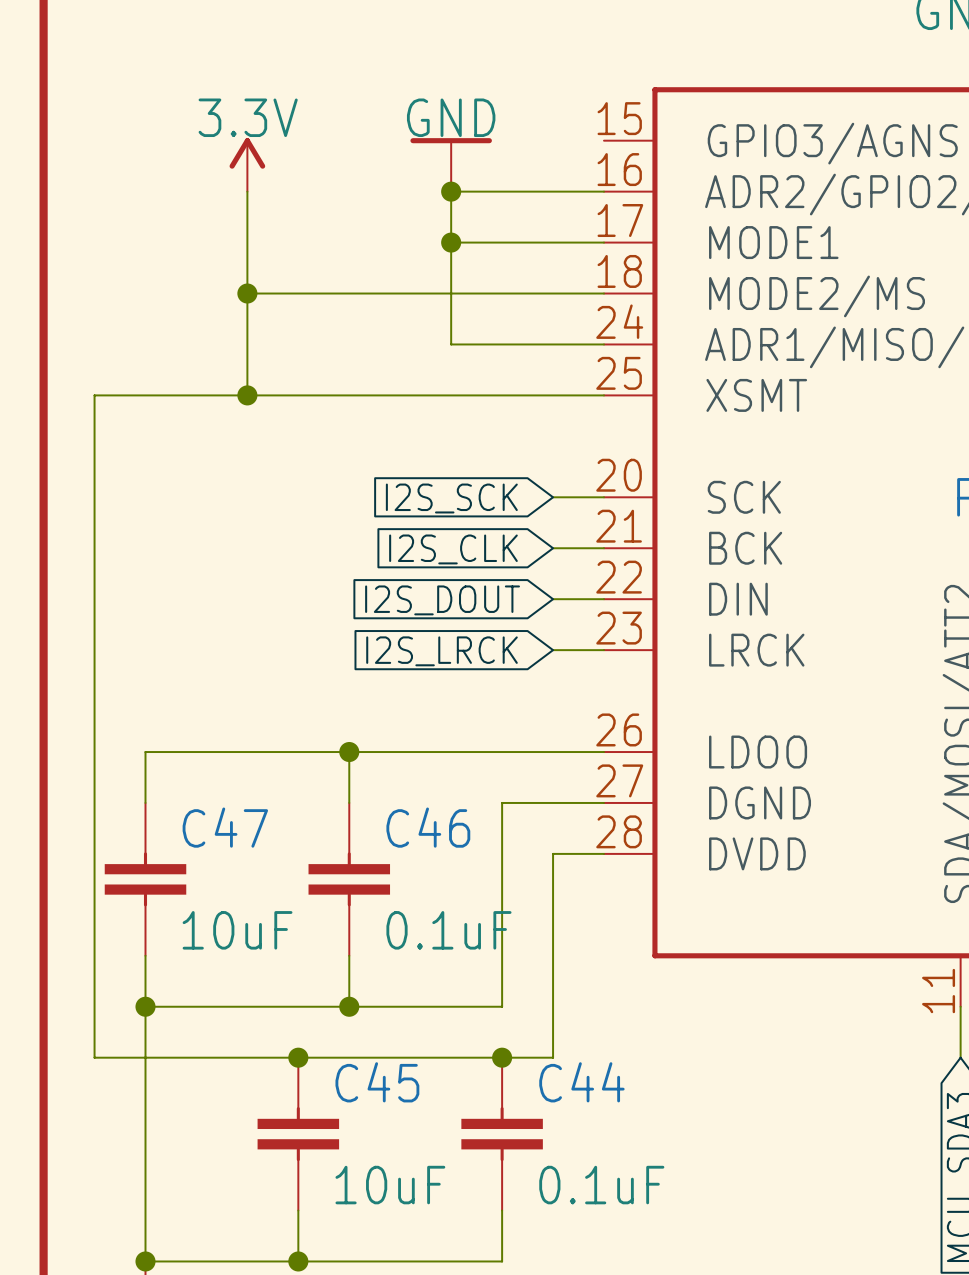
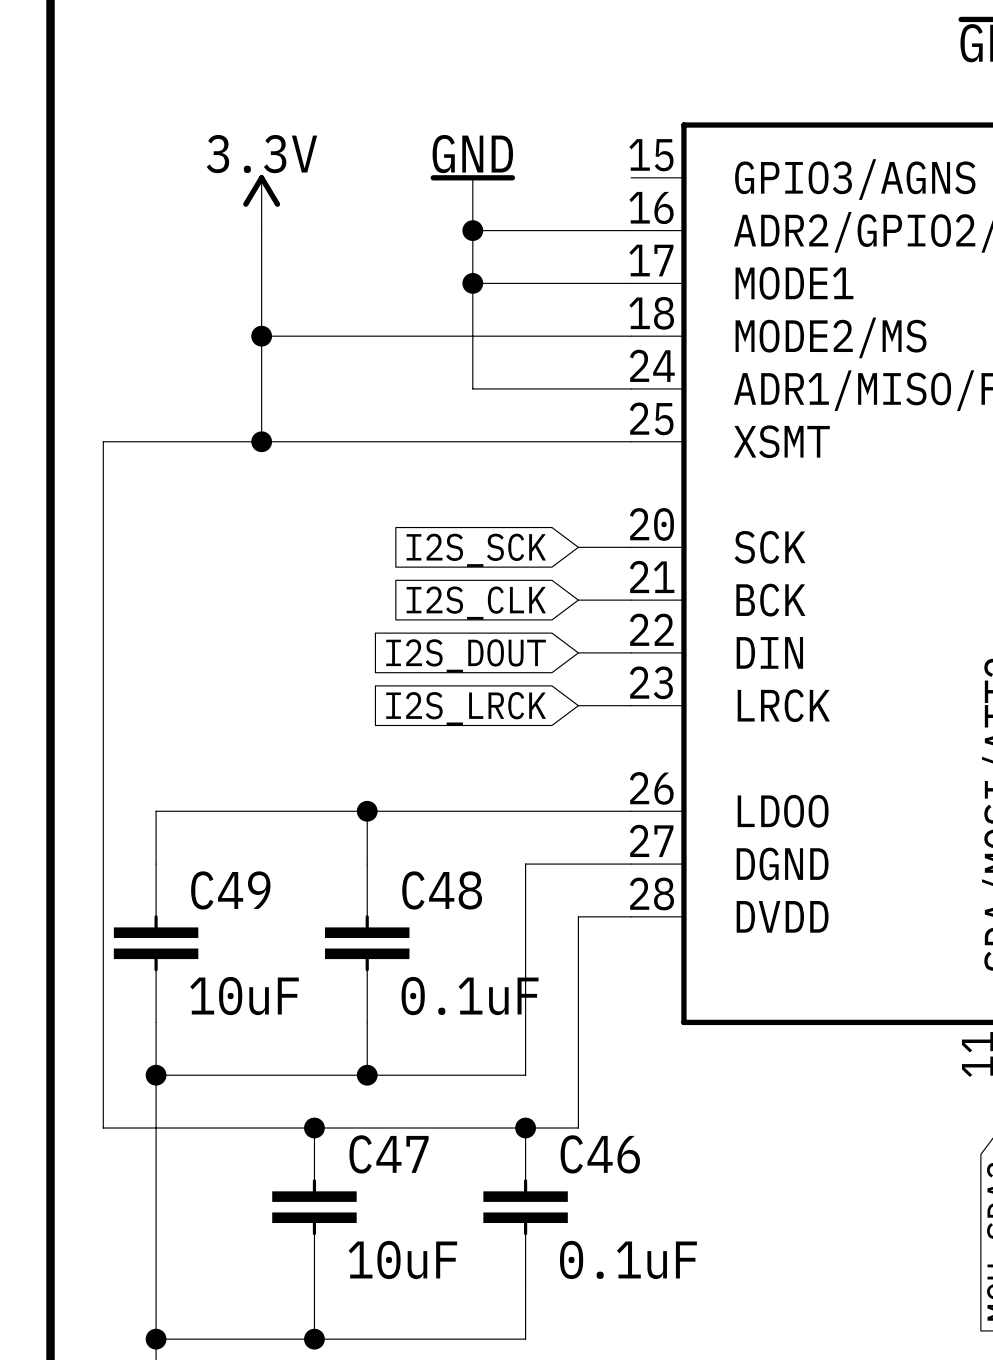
C47 name: C47 (225, 827) -> C49 (230, 890)
C46 name: C46 (428, 827) -> C48 (442, 890)
C45 name: C45 (377, 1082) -> C47 (389, 1154)
C44 name: C44 (581, 1082) -> C46 (600, 1154)

